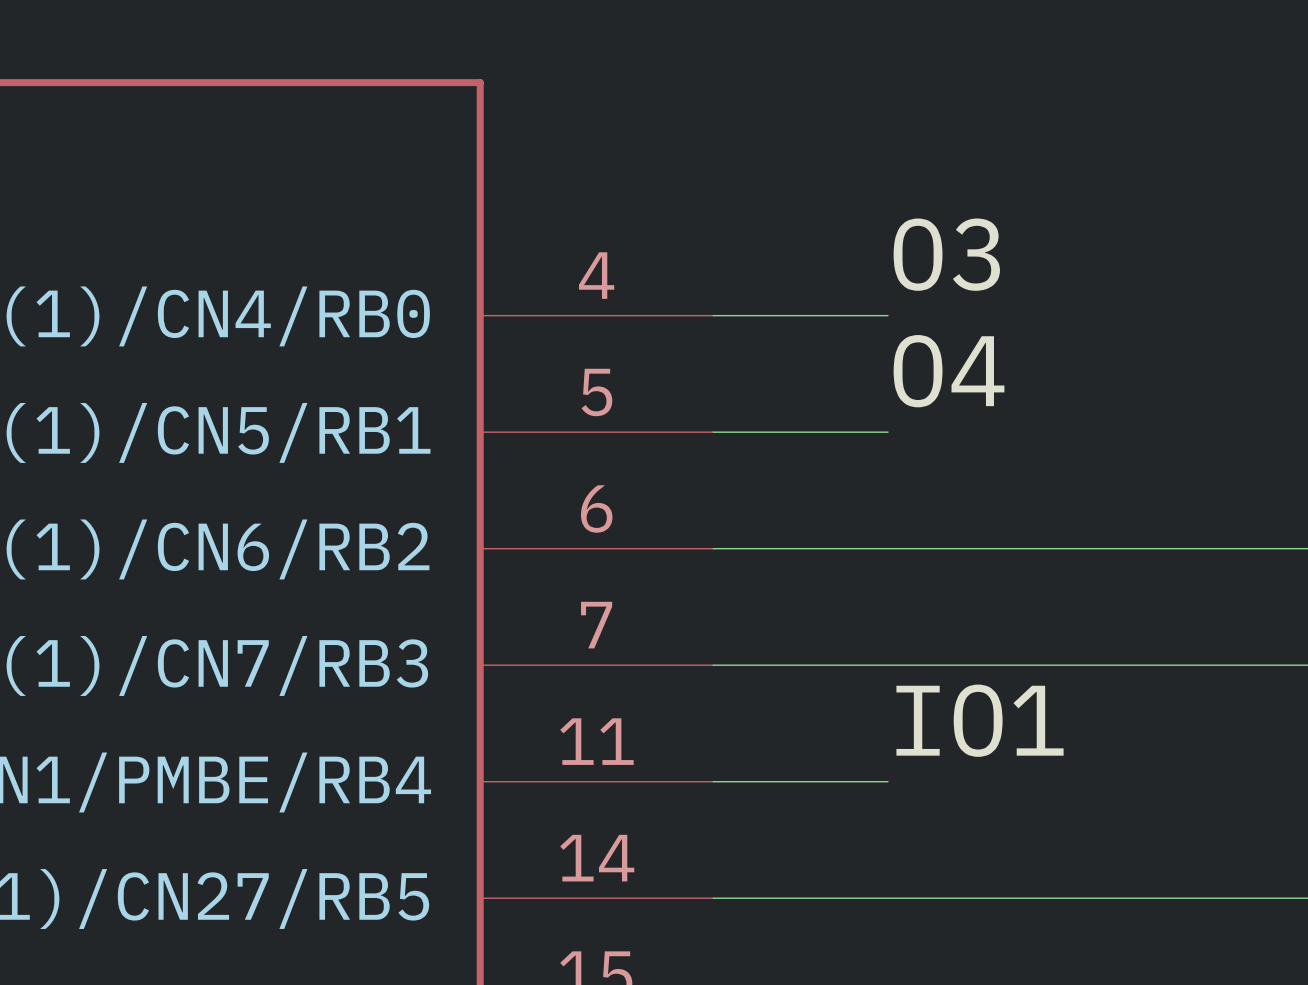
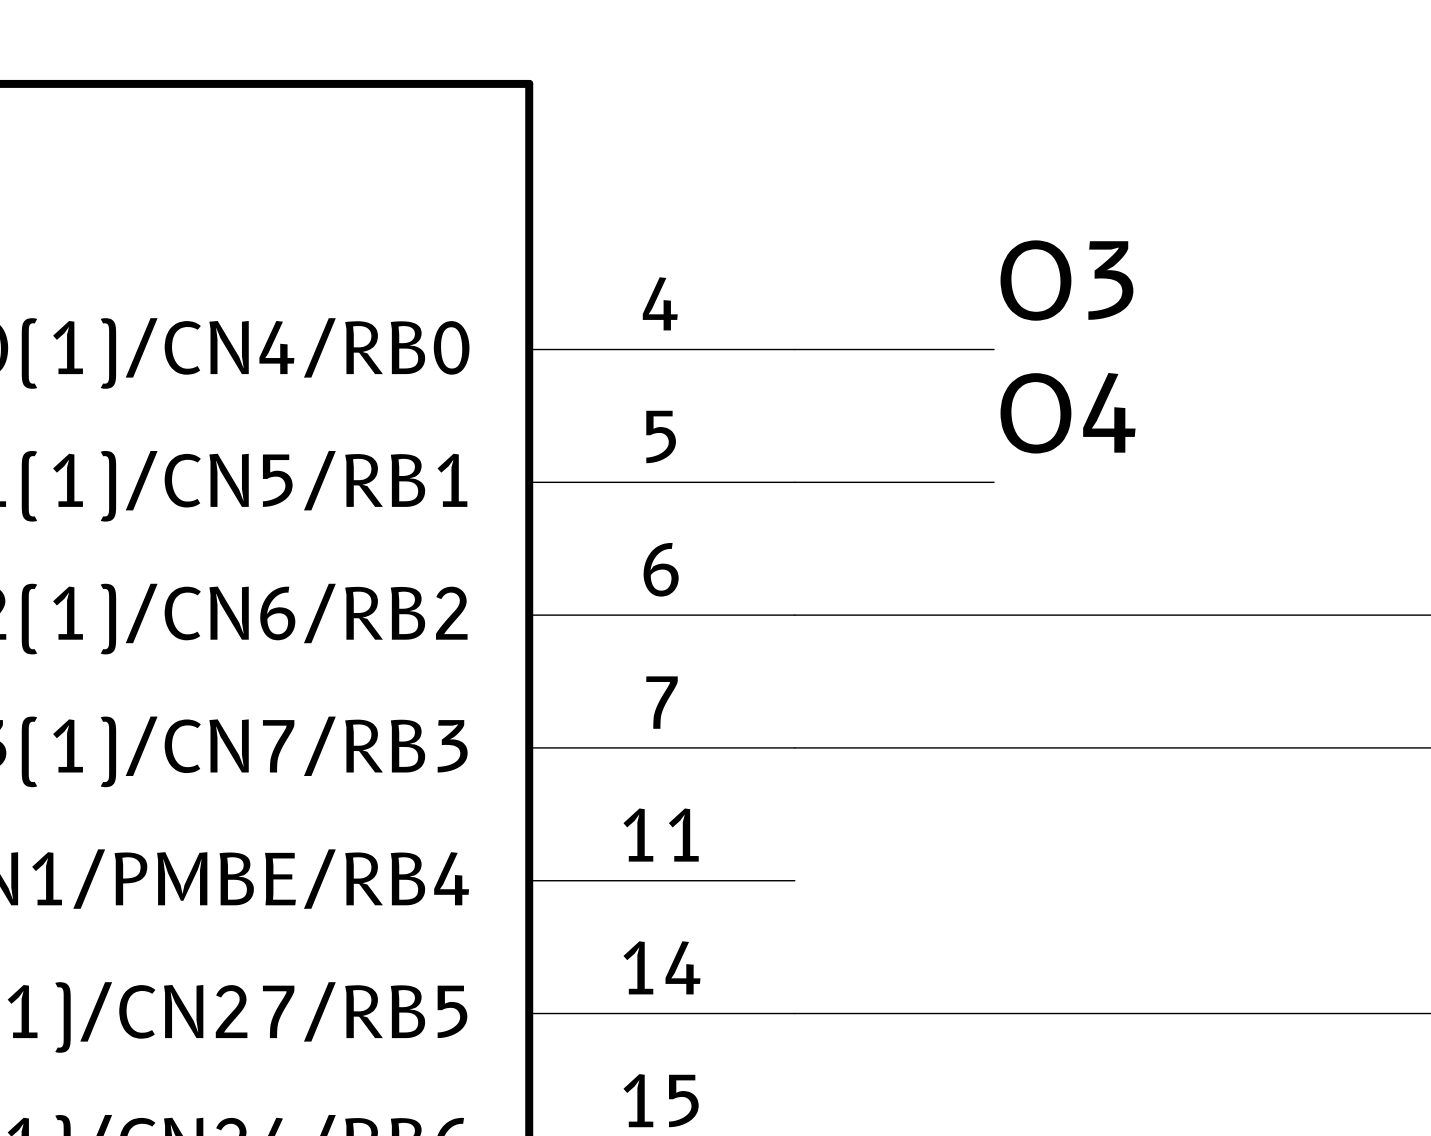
label: IO1 (980, 720) -> none
wire: (713, 781) (888, 781) -> none

